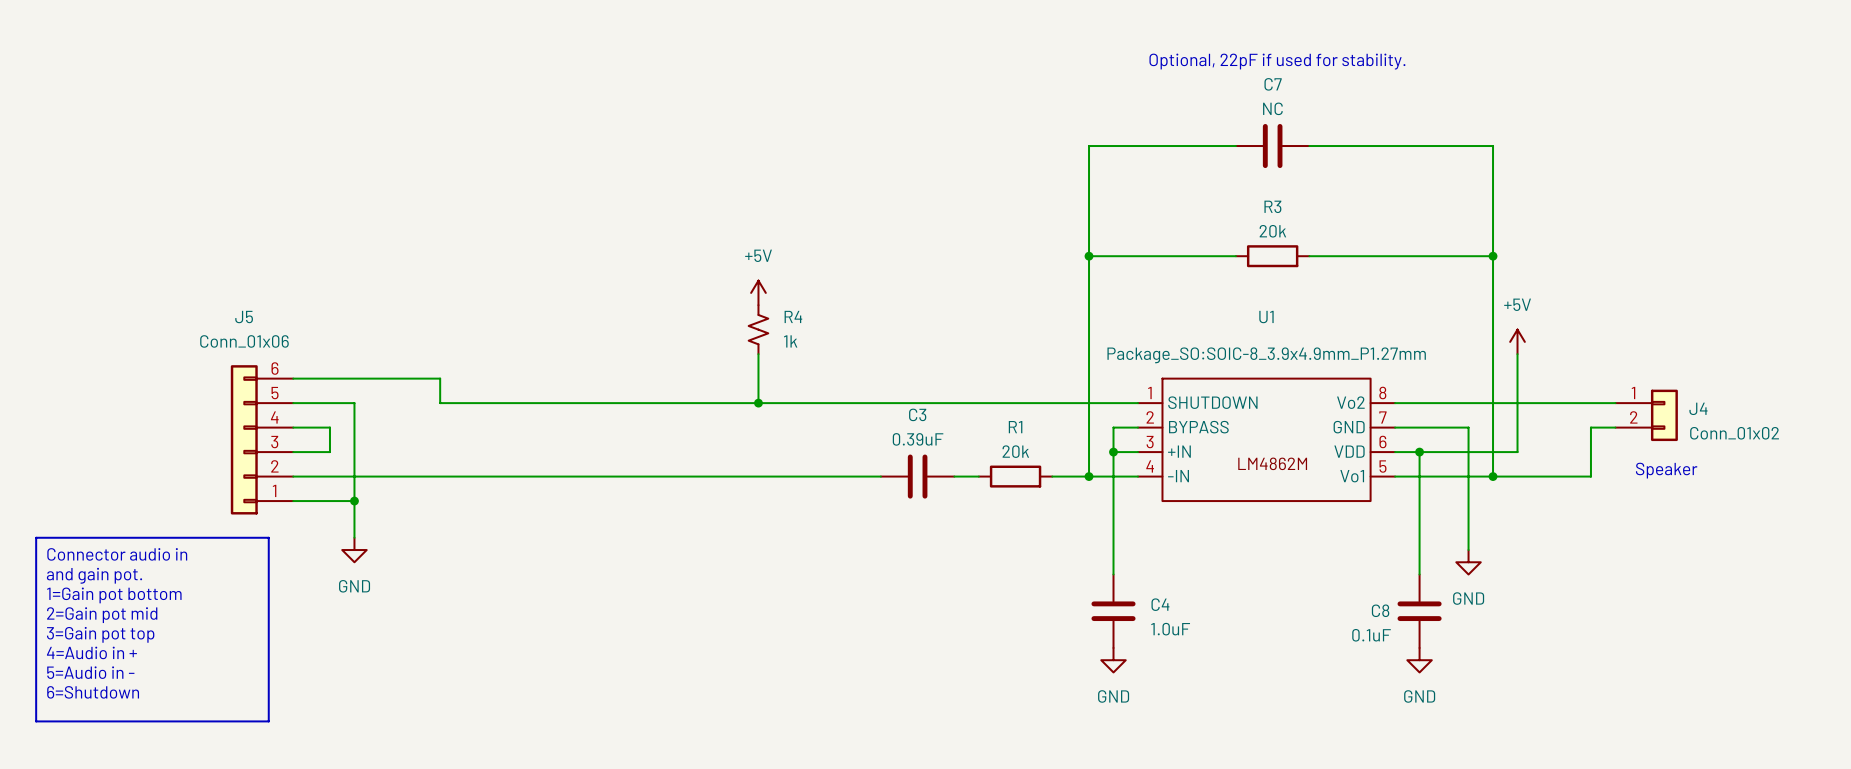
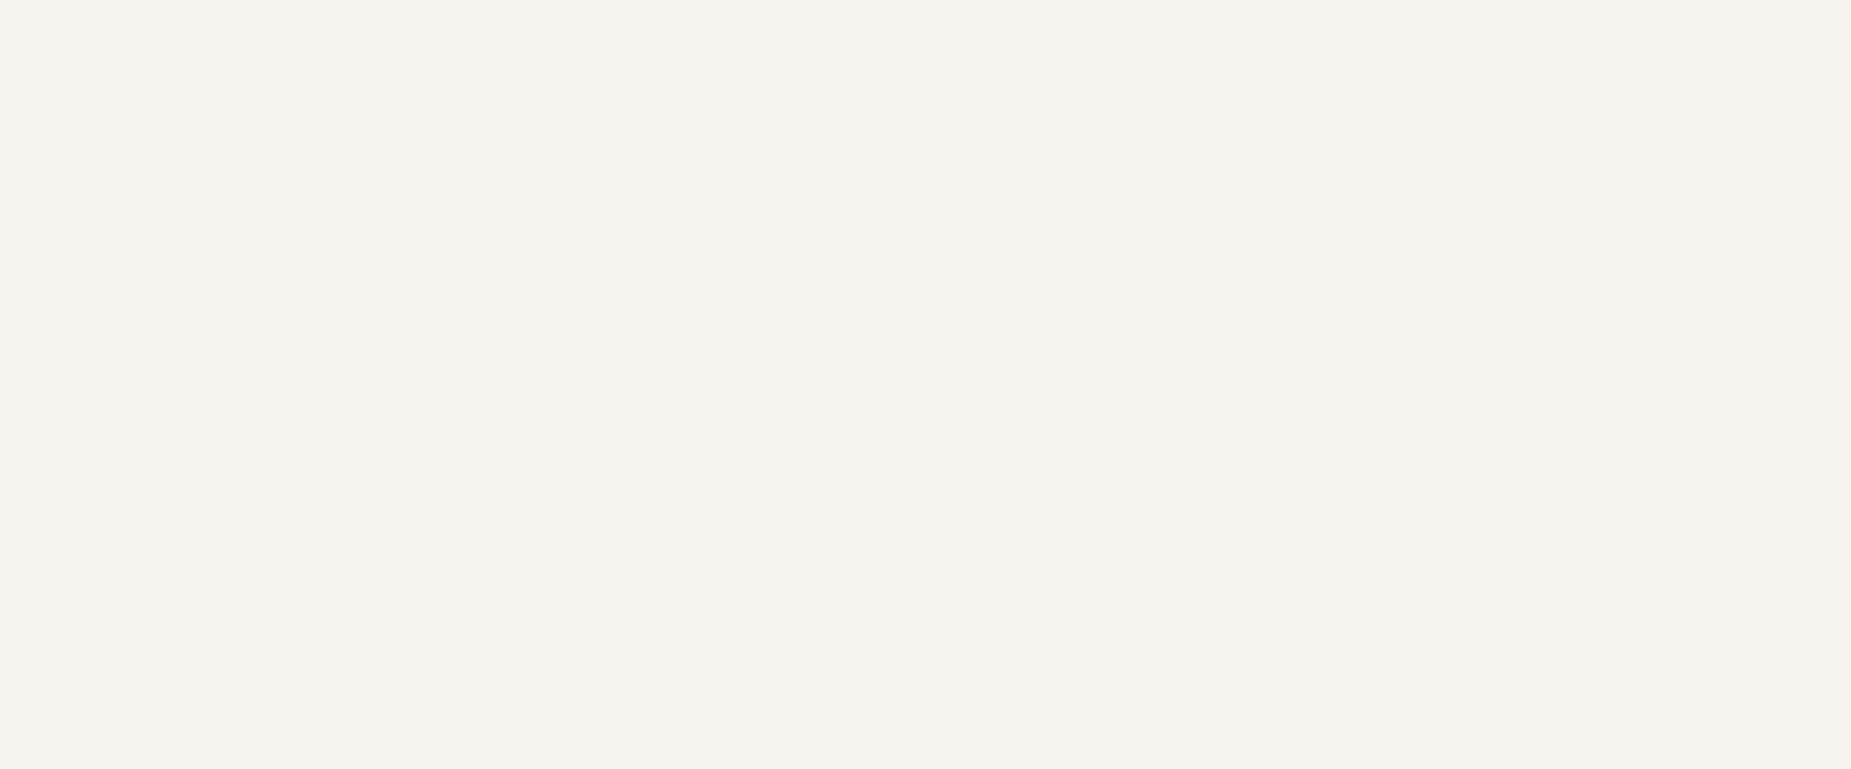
text: Optional, 22pF if used for stability. (1277, 61) -> none
wire: (1235, 146) (1089, 146) (1089, 476) -> none
C7: NC (1272, 146) -> none
wire: (1309, 146) (1493, 146) (1493, 476) -> none
wire: (1089, 256) (1235, 256) -> none
junction: (1089, 256) -> none
R3: 20k (1272, 256) -> none
wire: (1309, 256) (1493, 256) -> none
junction: (1493, 256) -> none
power symbol: +5V (758, 292) -> none
R4: 1k (758, 329) -> none
power symbol: +5V (1517, 341) -> none
wire: (758, 354) (758, 403) -> none
wire: (1517, 354) (1517, 452) (1395, 452) -> none
wire: (293, 378) (440, 378) (440, 403) (1137, 403) -> none
wire: (293, 403) (354, 403) (354, 537) -> none
junction: (758, 403) -> none
wire: (1395, 403) (1615, 403) -> none
J4: Conn_01x02 (1646, 415) -> none
wire: (293, 427) (329, 427) (329, 452) (293, 452) -> none
wire: (1137, 427) (1113, 427) (1113, 574) -> none
wire: (1395, 427) (1468, 427) (1468, 550) -> none
wire: (1615, 427) (1590, 427) (1590, 476) (1395, 476) -> none
J5: Conn_01x06 (262, 439) -> none
U1: (1266, 439) -> none
wire: (1113, 452) (1137, 452) -> none
junction: (1113, 452) -> none
wire: (1419, 452) (1419, 574) -> none
junction: (1419, 452) -> none
text: Speaker (1666, 470) -> none
wire: (293, 476) (880, 476) -> none
C3: 0.39uF (917, 476) -> none
wire: (954, 476) (978, 476) -> none
R1: 20k (1015, 476) -> none
wire: (1052, 476) (1137, 476) -> none
junction: (1089, 476) -> none
junction: (1493, 476) -> none
wire: (293, 501) (354, 501) -> none
junction: (354, 501) -> none
line: (36, 537) (268, 537) (268, 721) (36, 721) (36, 537) -> none
power symbol: GND (354, 550) -> none
text: Connector audio in (117, 554) -> none
power symbol: GND (1468, 562) -> none
text: and gain pot. (94, 575) -> none
text: 1=Gain pot bottom (114, 595) -> none
C4: 1.0uF (1113, 611) -> none
C8: 0.1uF (1419, 611) -> none
text: 2=Gain pot mid (102, 615) -> none
text: 3=Gain pot top (100, 634) -> none
text: 4=Audio in + (91, 652) -> none
power symbol: GND (1113, 660) -> none
power symbol: GND (1419, 660) -> none
text: 5=Audio in - (90, 672) -> none
text: 6=Shutdown (93, 692) -> none

